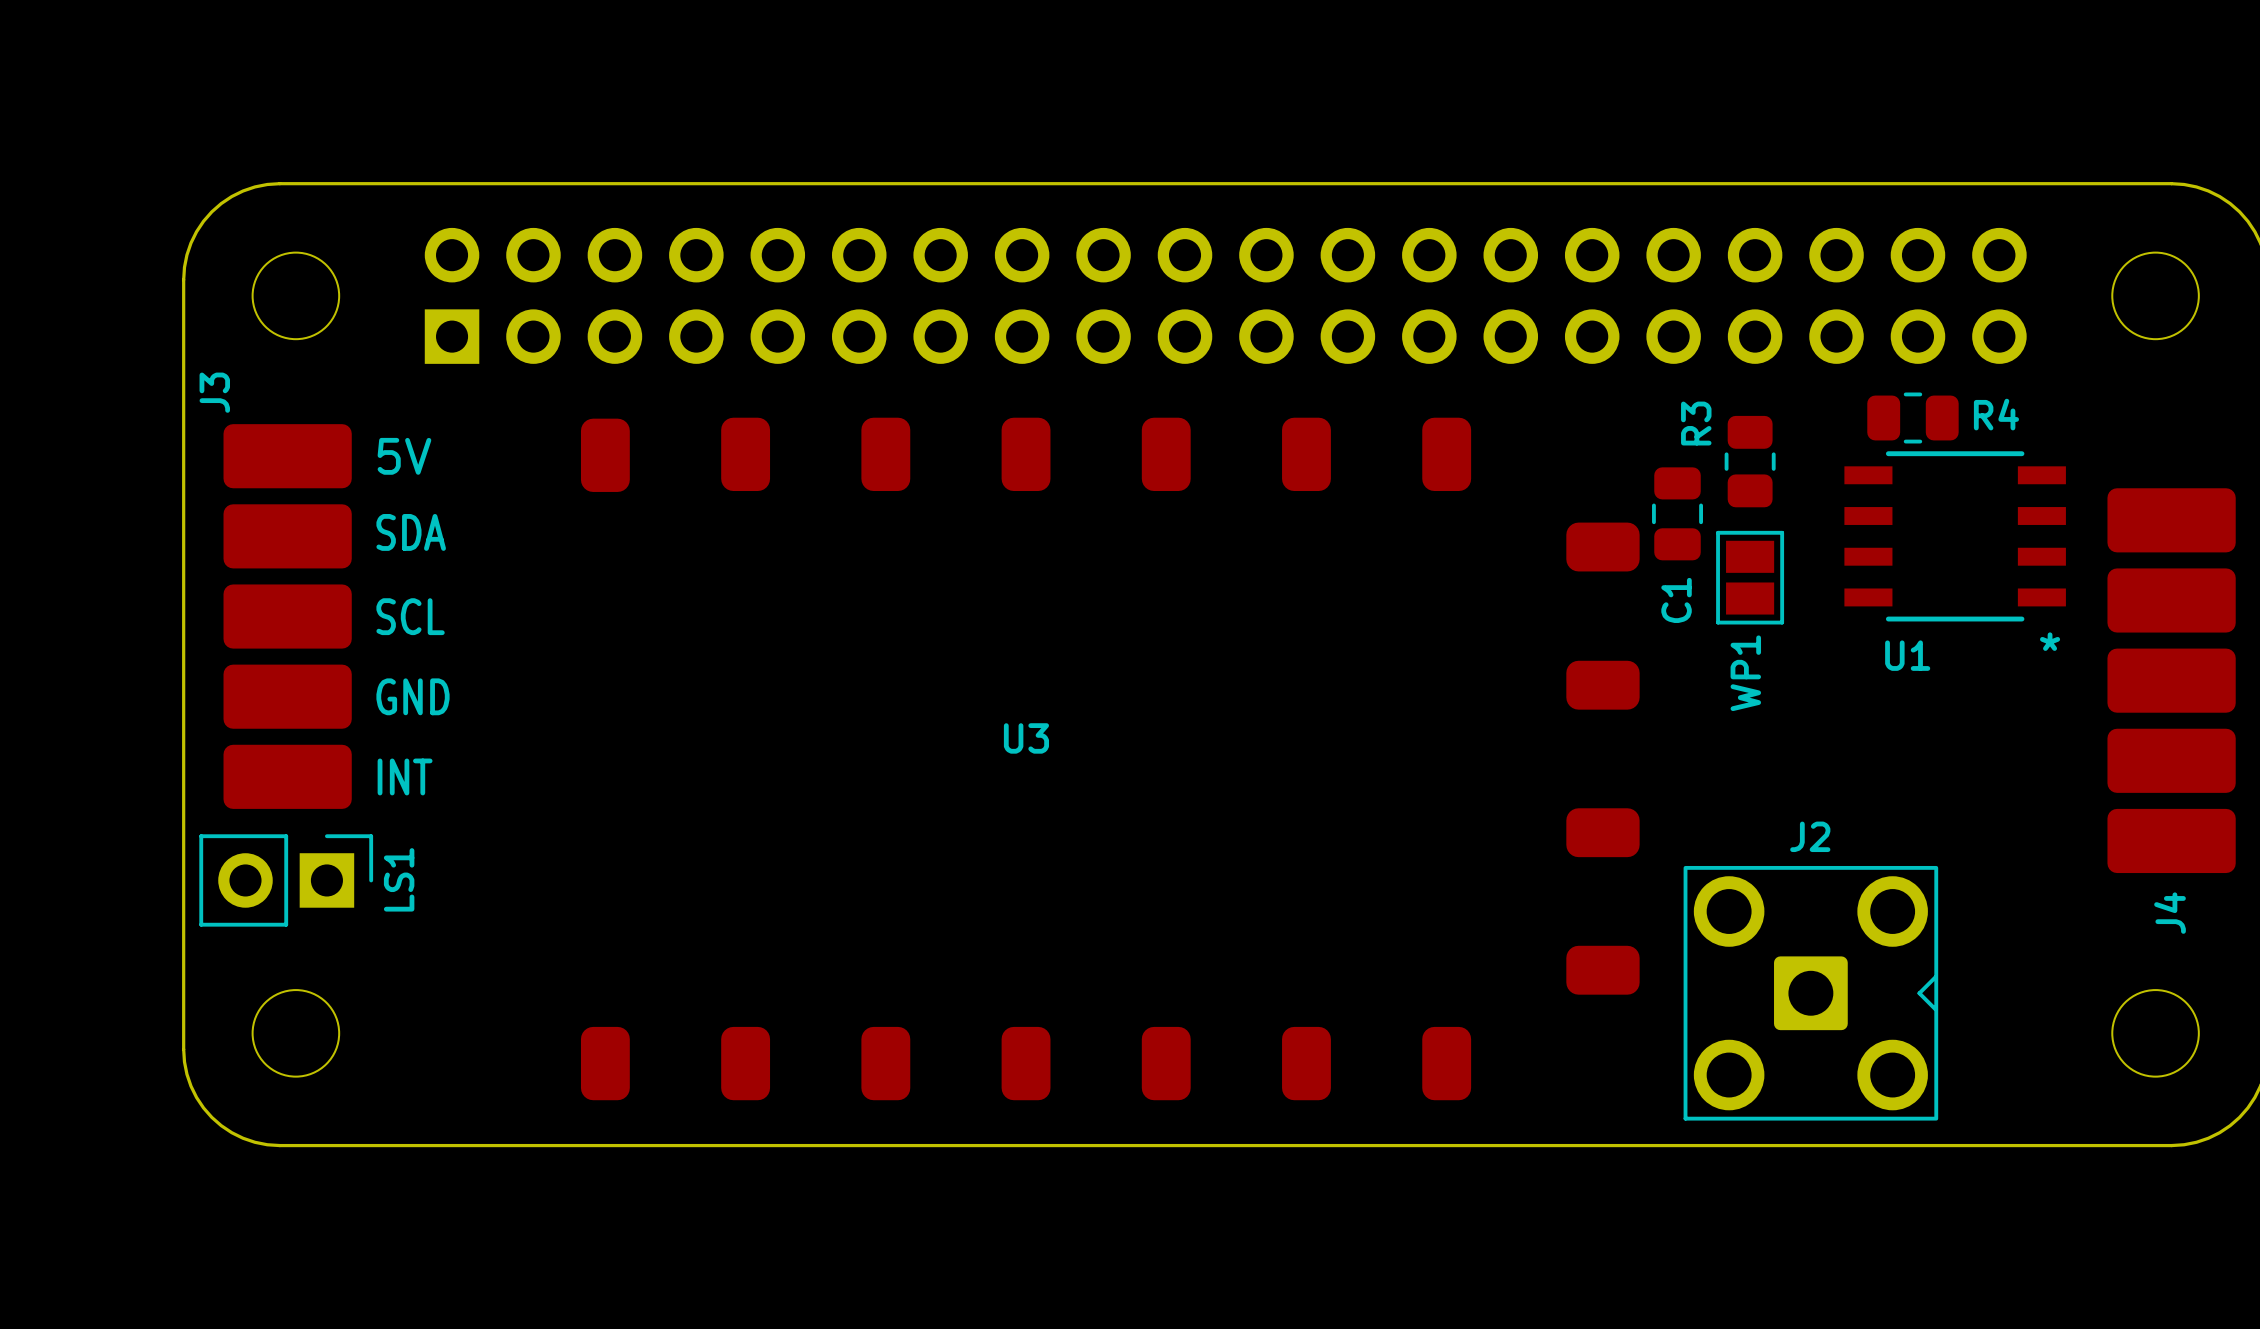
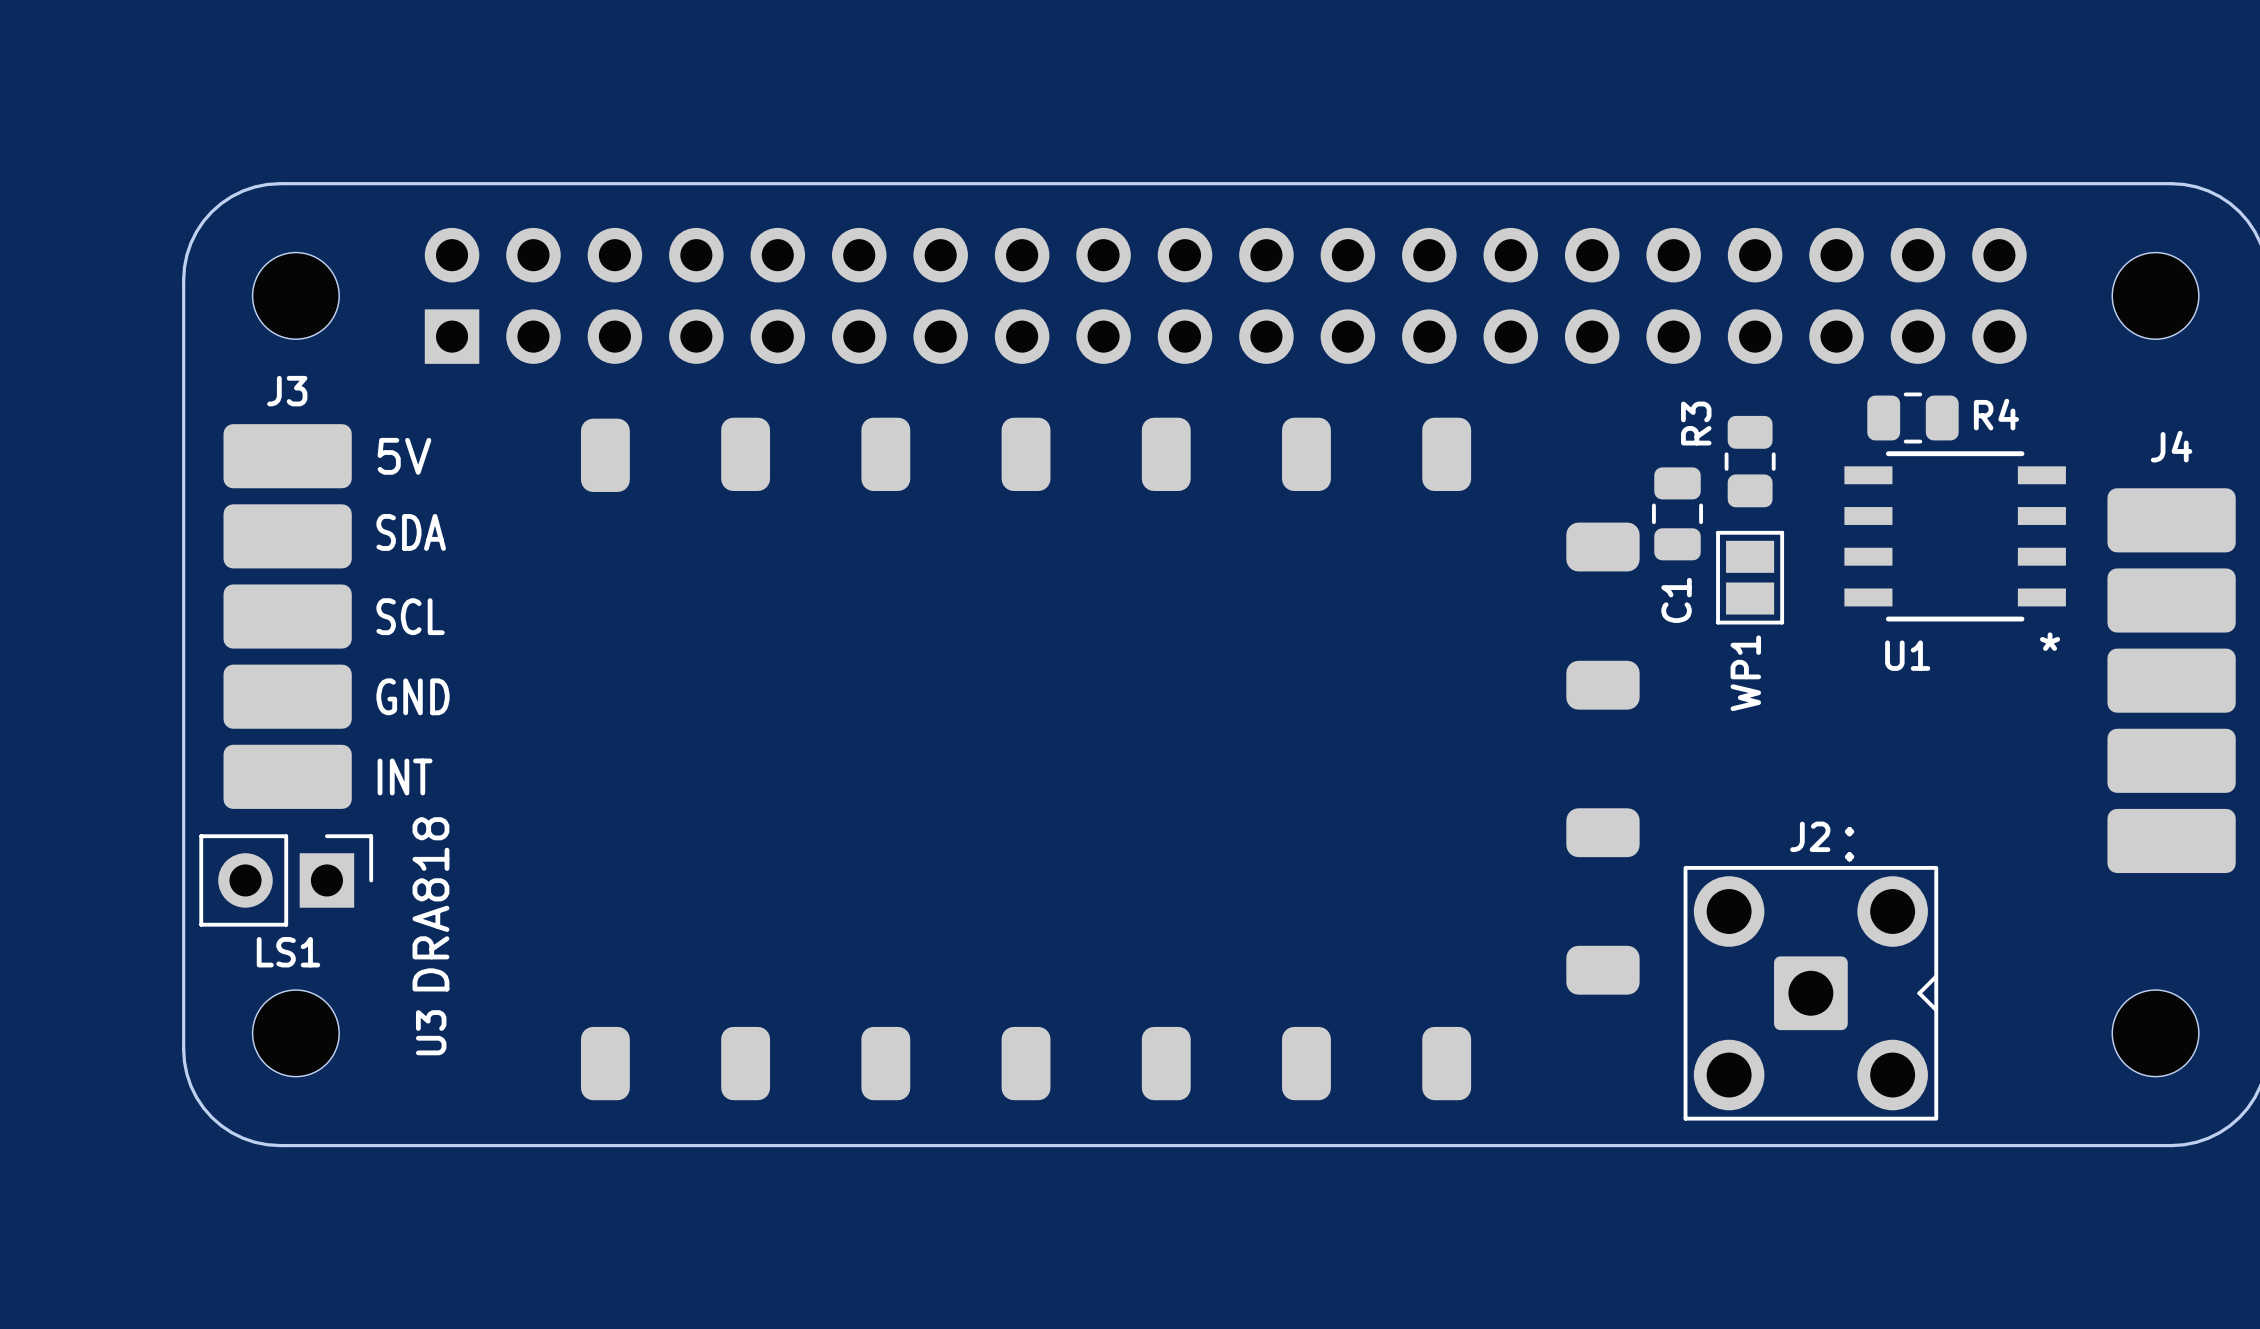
J3 name rotation: 0° (214, 392) -> 90° clockwise (287, 391)
J3 name position: J3 (214, 392) -> J3 (287, 391)
U3 name rotation: 0° (1026, 738) -> 90° counterclockwise (431, 1032)
U3 name position: U3 (1026, 738) -> U3 (431, 1032)
text: none -> : (1849, 844)
LS1 name rotation: 0° (399, 879) -> 90° clockwise (288, 952)
LS1 name position: LS1 (399, 879) -> LS1 (288, 952)
U3 value: none -> DRA818 (430, 904)
J4 name rotation: 0° (2170, 913) -> 90° clockwise (2171, 446)
J4 name position: J4 (2170, 913) -> J4 (2171, 446)

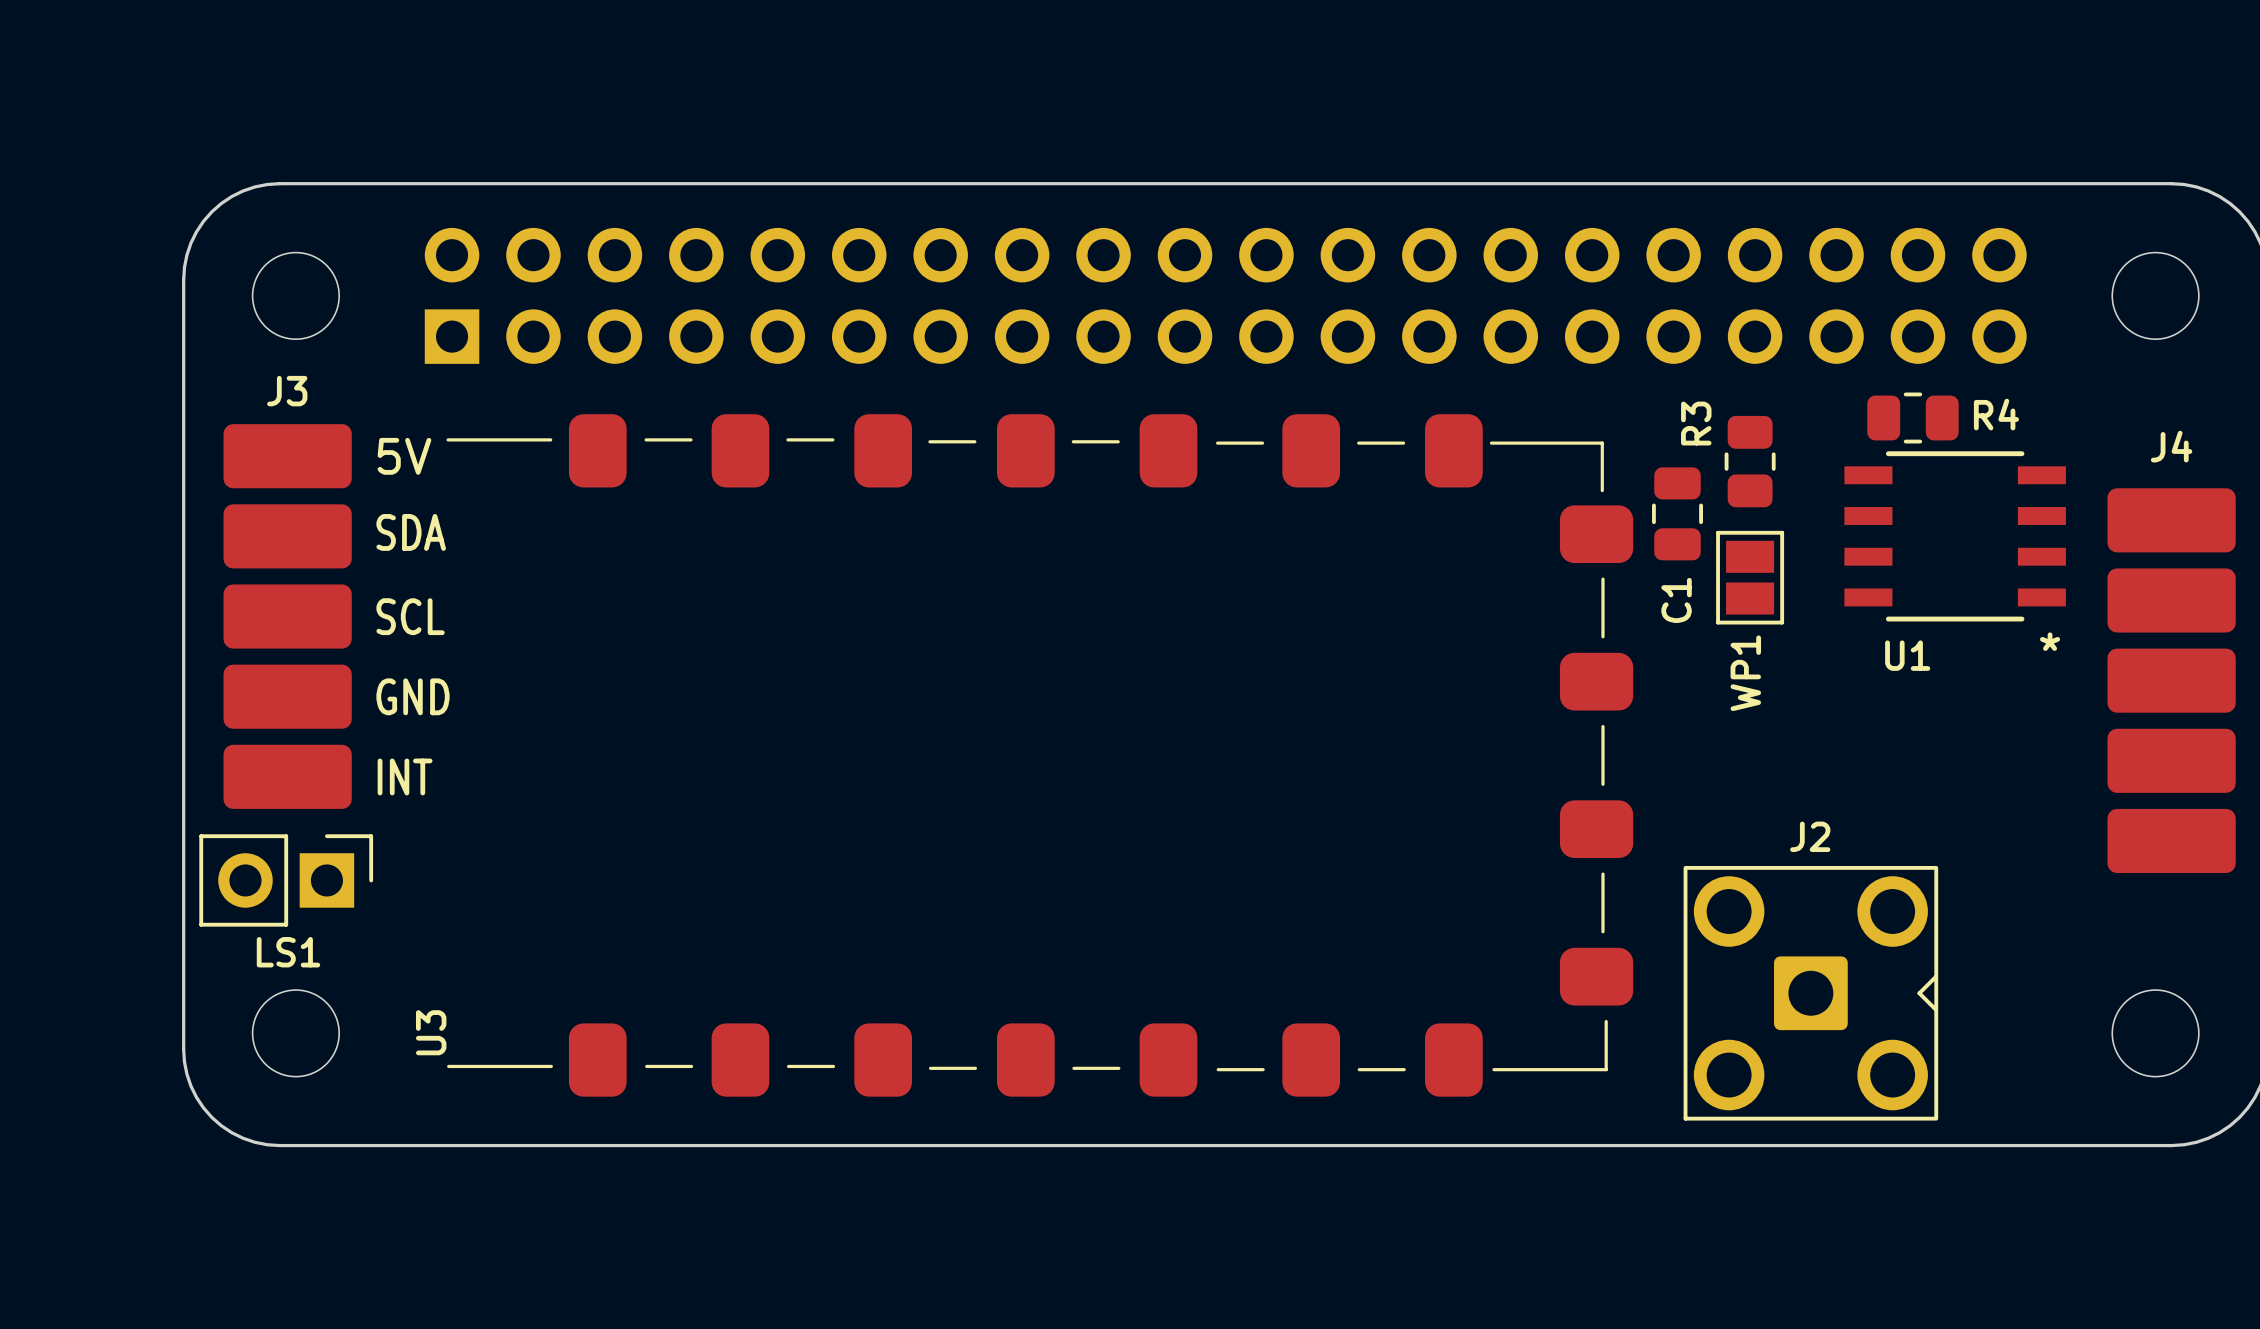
U3 footprint: [580, 417, 1640, 1101] -> [446, 414, 1634, 1097]
text: : (1849, 844) -> none
U3 value: DRA818 (430, 904) -> none

